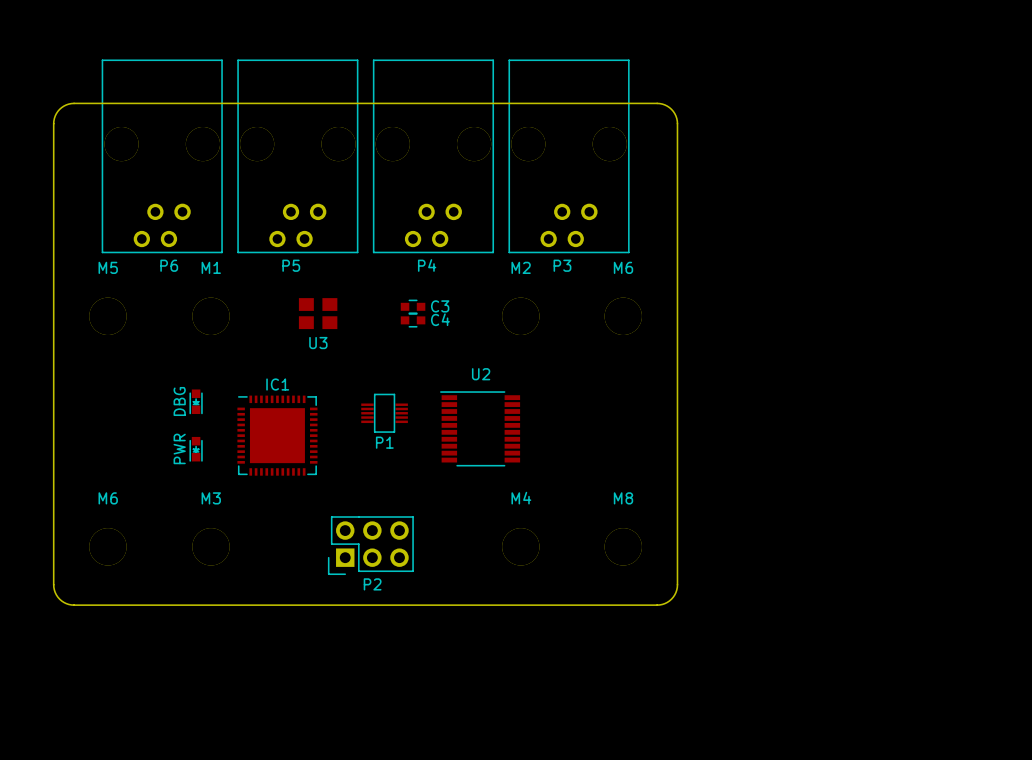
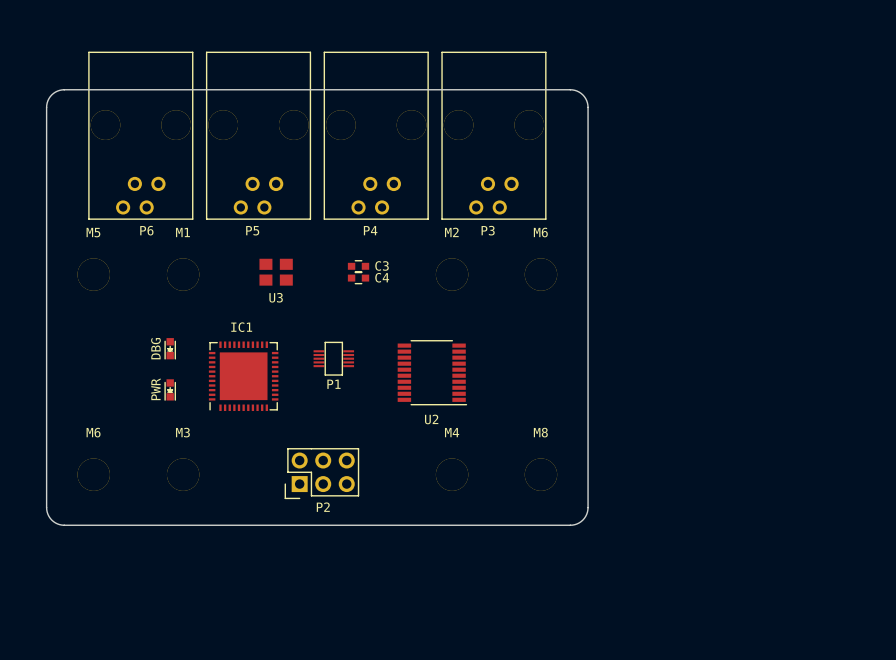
U2 rotation: 0° (480, 428) -> 180° (432, 372)
IC1 rotation: 0° (277, 435) -> 90° counterclockwise (243, 376)

